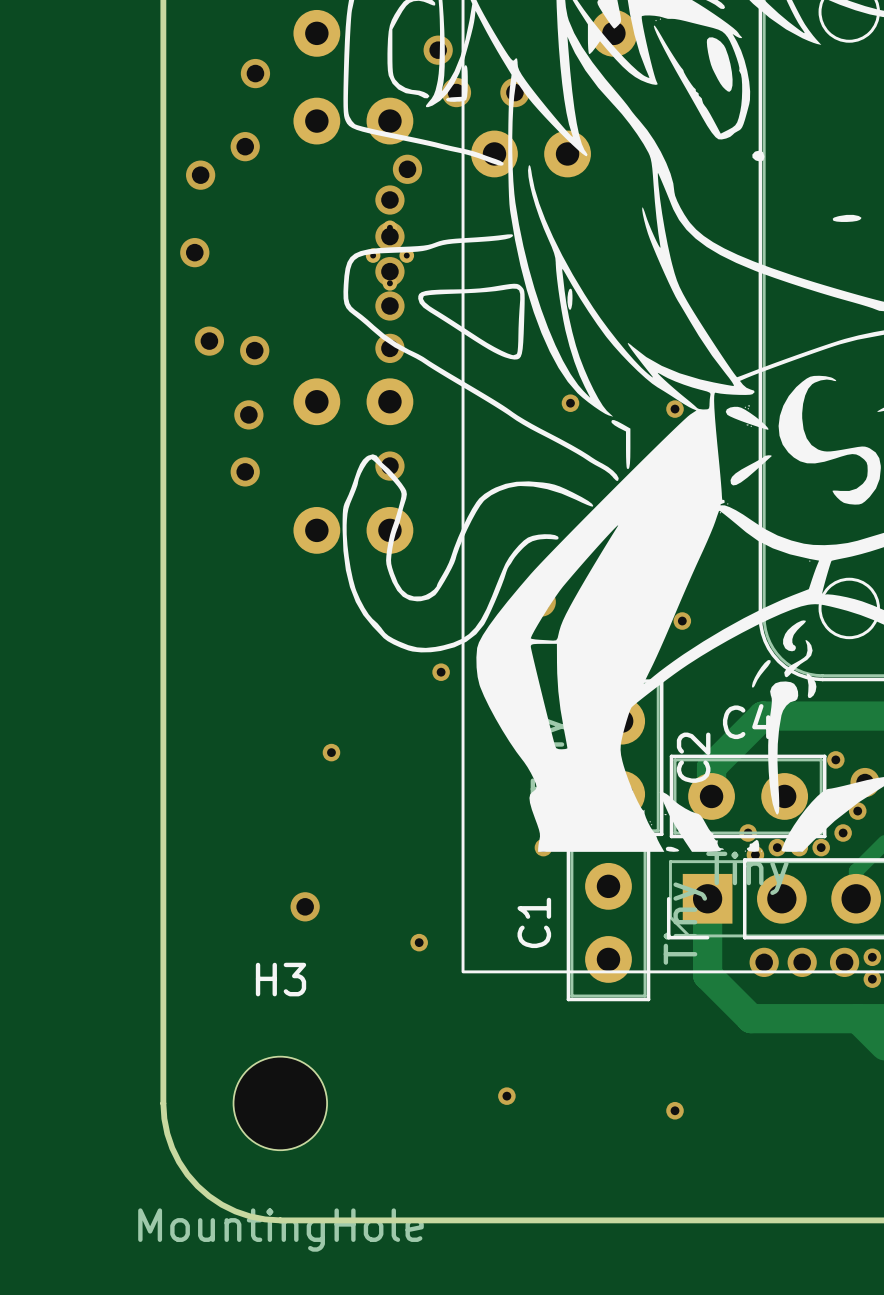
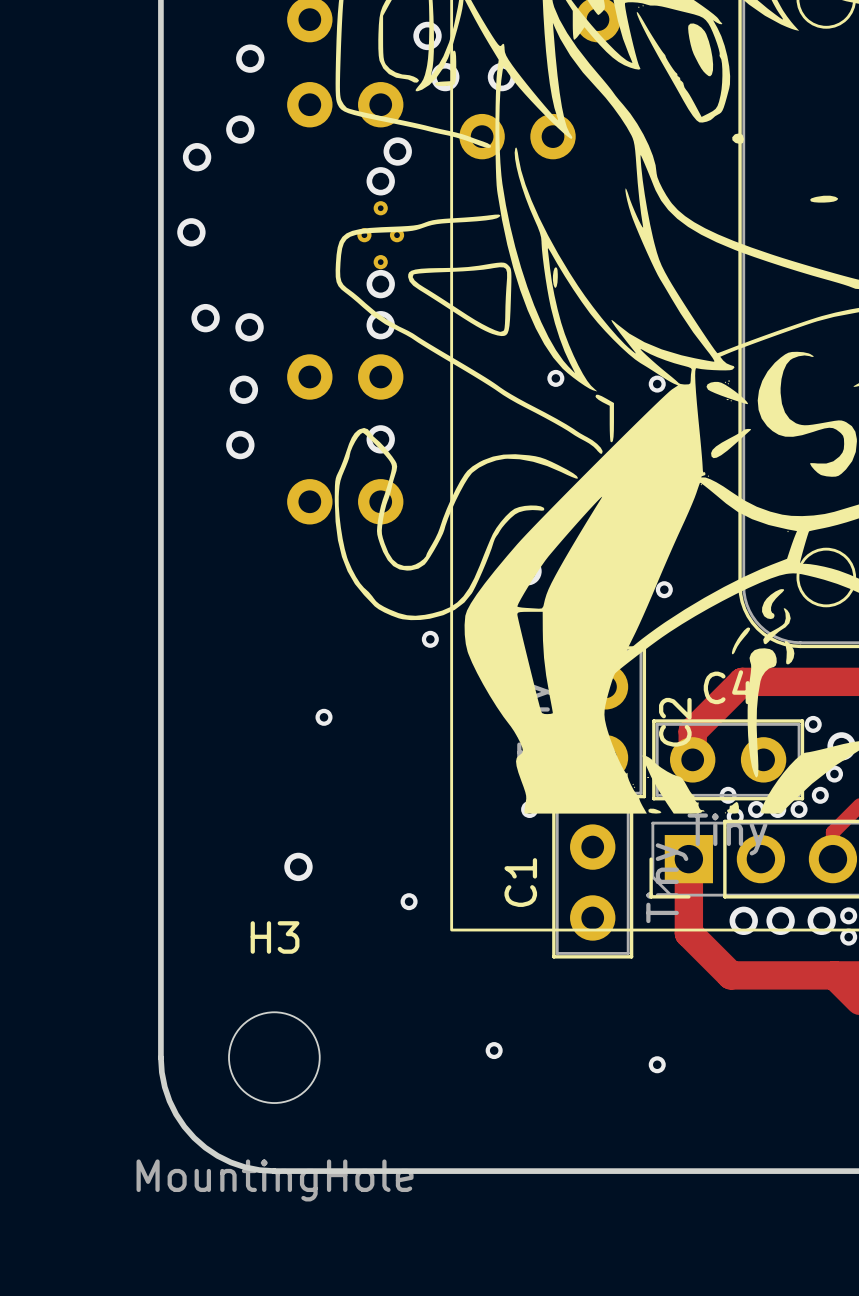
via: (389, 236) -> none
via: (389, 271) -> none

